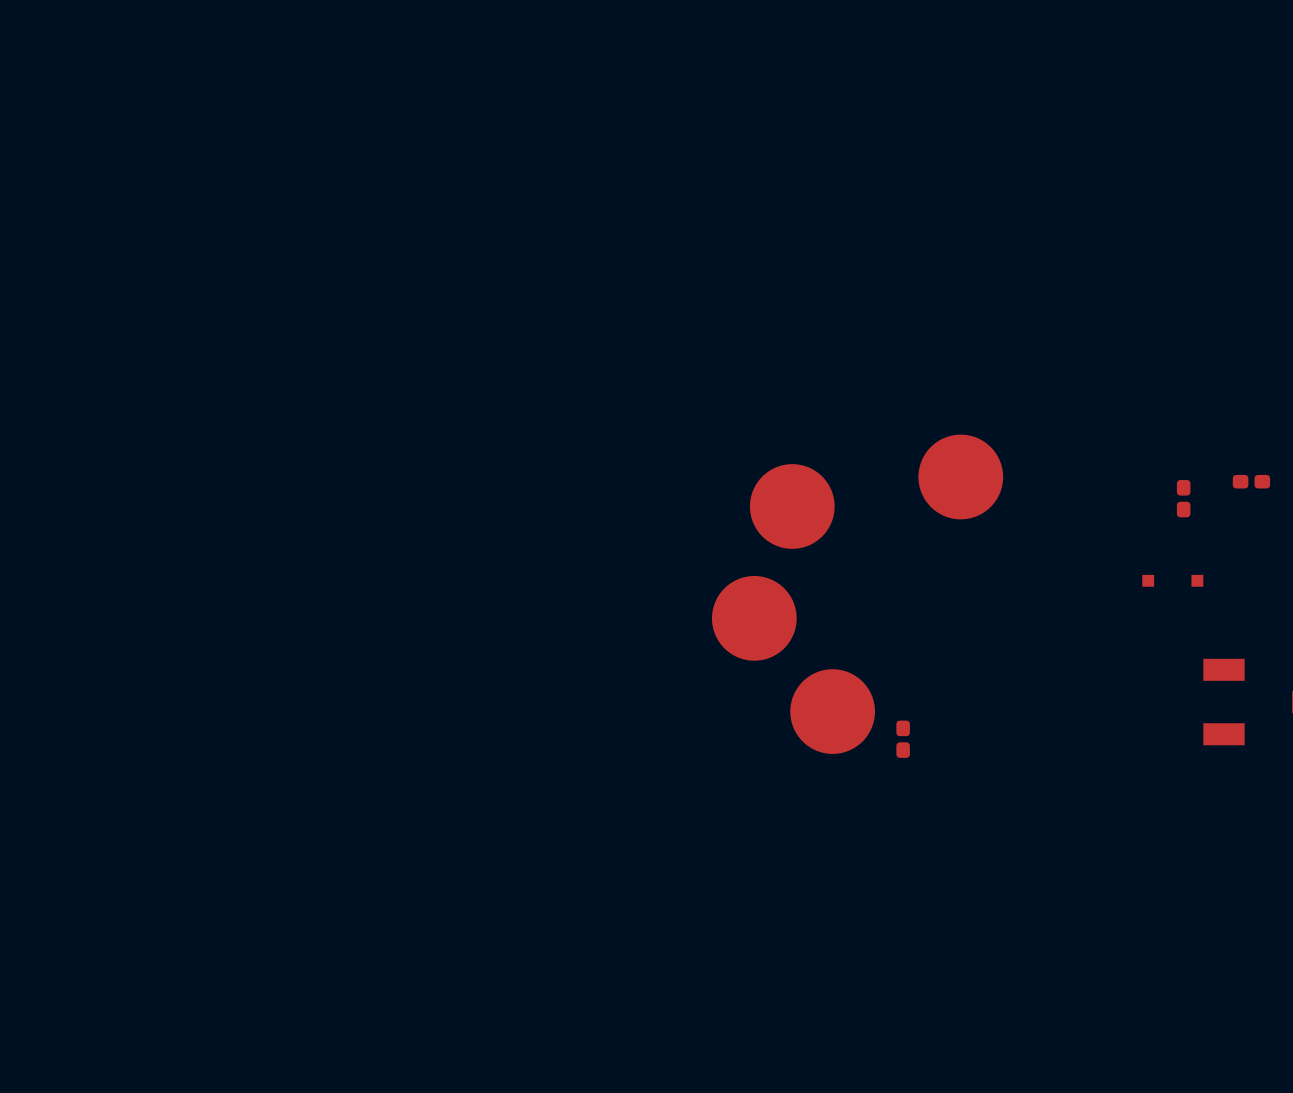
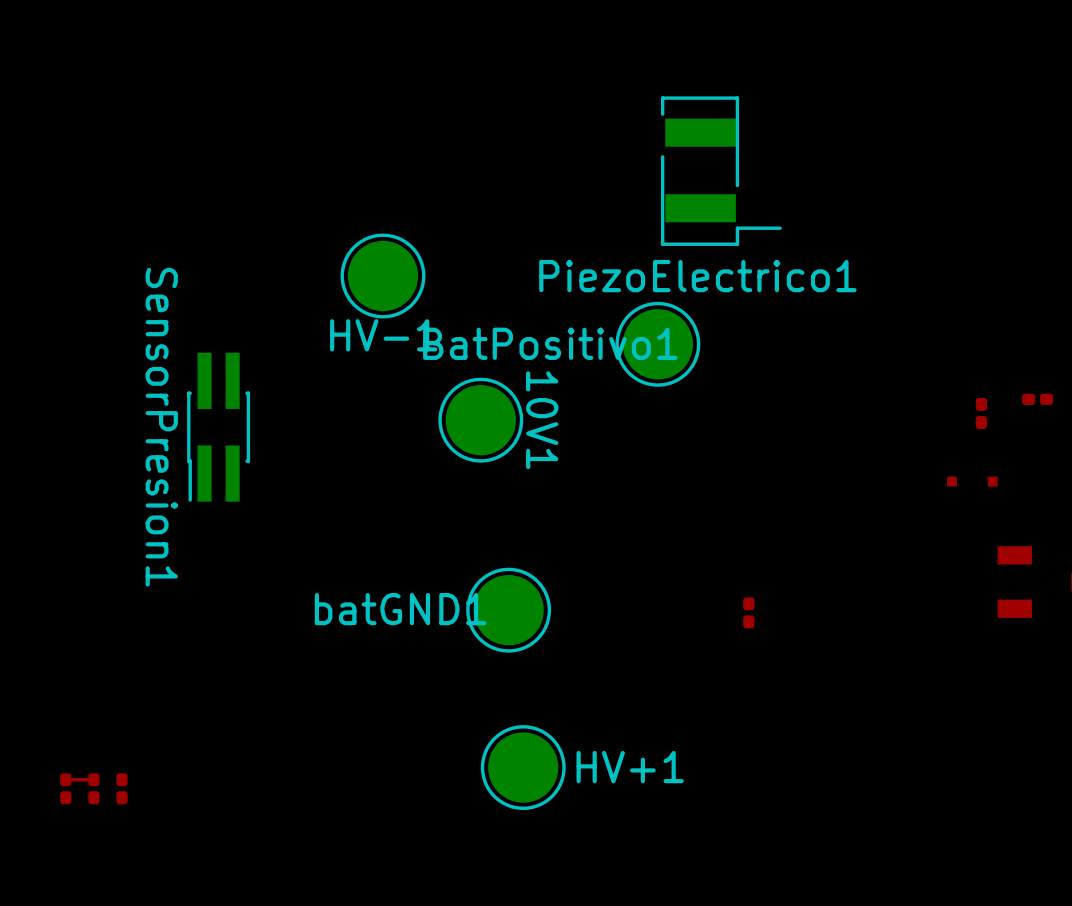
PiezoElectrico1: none -> (721, 171)
batGND1 side: top (960, 476) -> bottom (508, 610)
10V1: none -> (480, 420)
HV+1 side: top (792, 506) -> bottom (523, 767)
SensorPresion1: none -> (218, 427)
HV-1 side: top (754, 618) -> bottom (383, 276)
BatPositivo1 side: top (832, 711) -> bottom (657, 344)
top track: none -> (93, 779) (65, 779)
part: none -> (65, 788)
part: none -> (93, 788)
part: none -> (122, 788)

